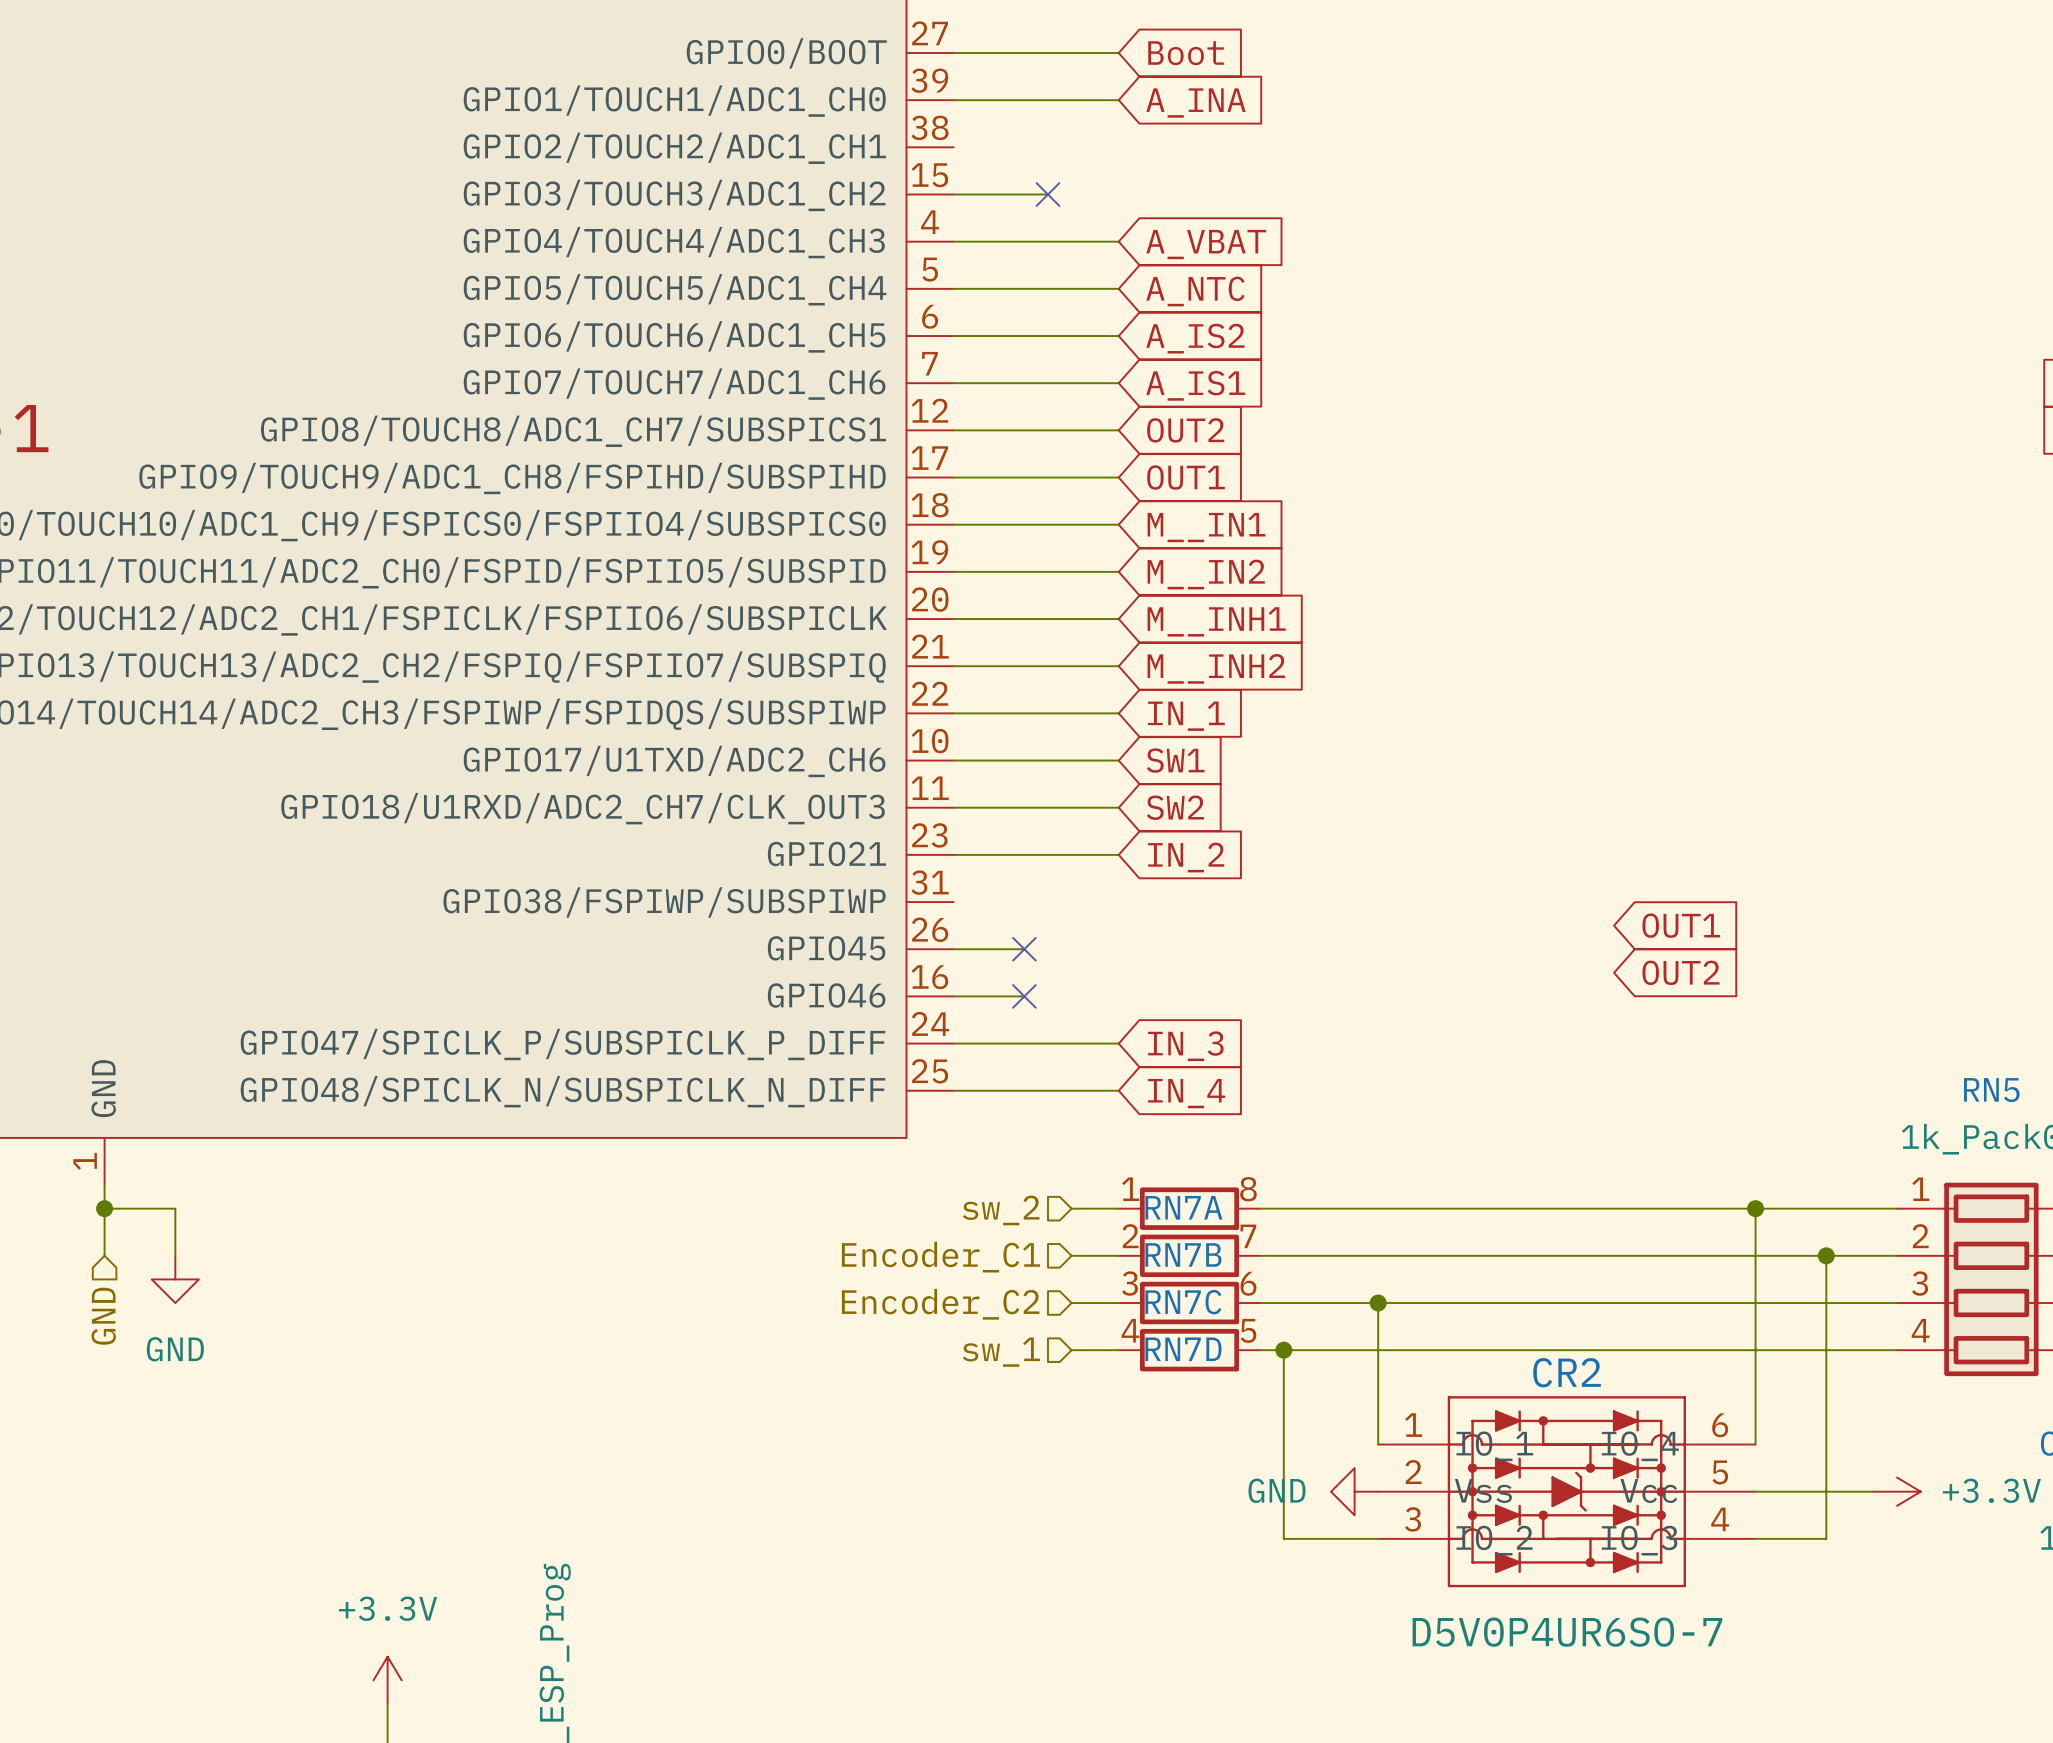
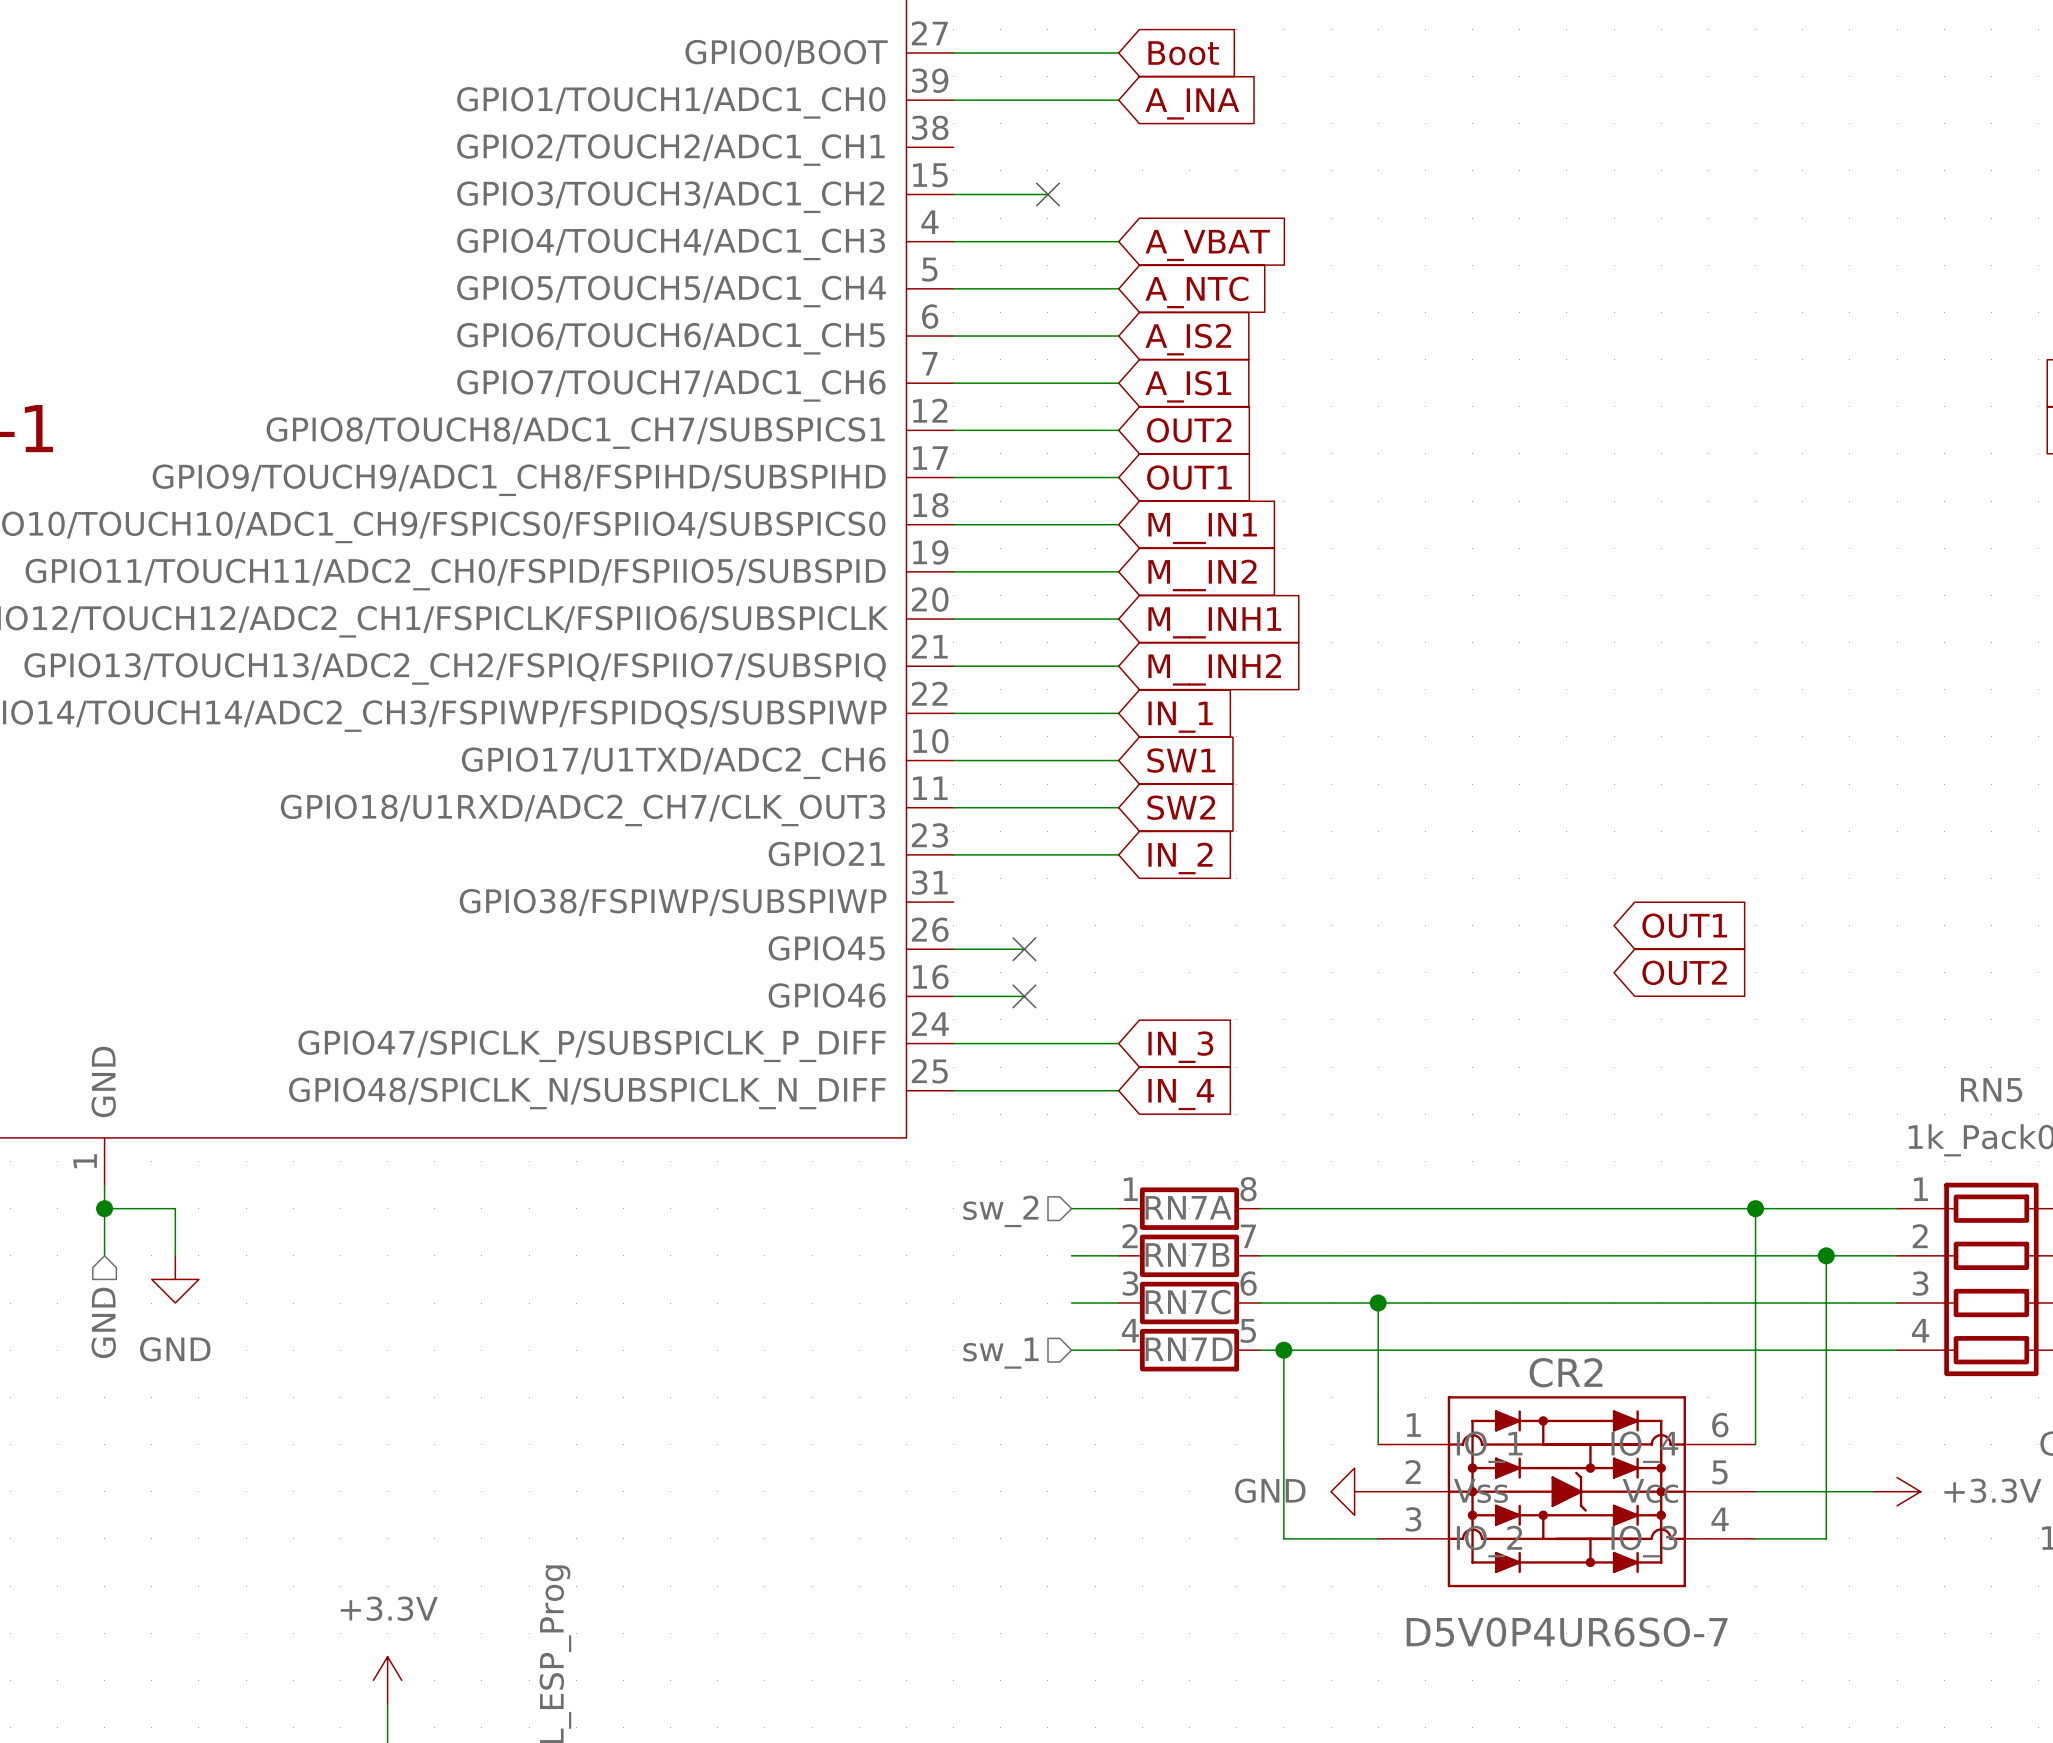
hierarchical label: Encoder_C1 (940, 1257) -> none
hierarchical label: Encoder_C2 (940, 1304) -> none

